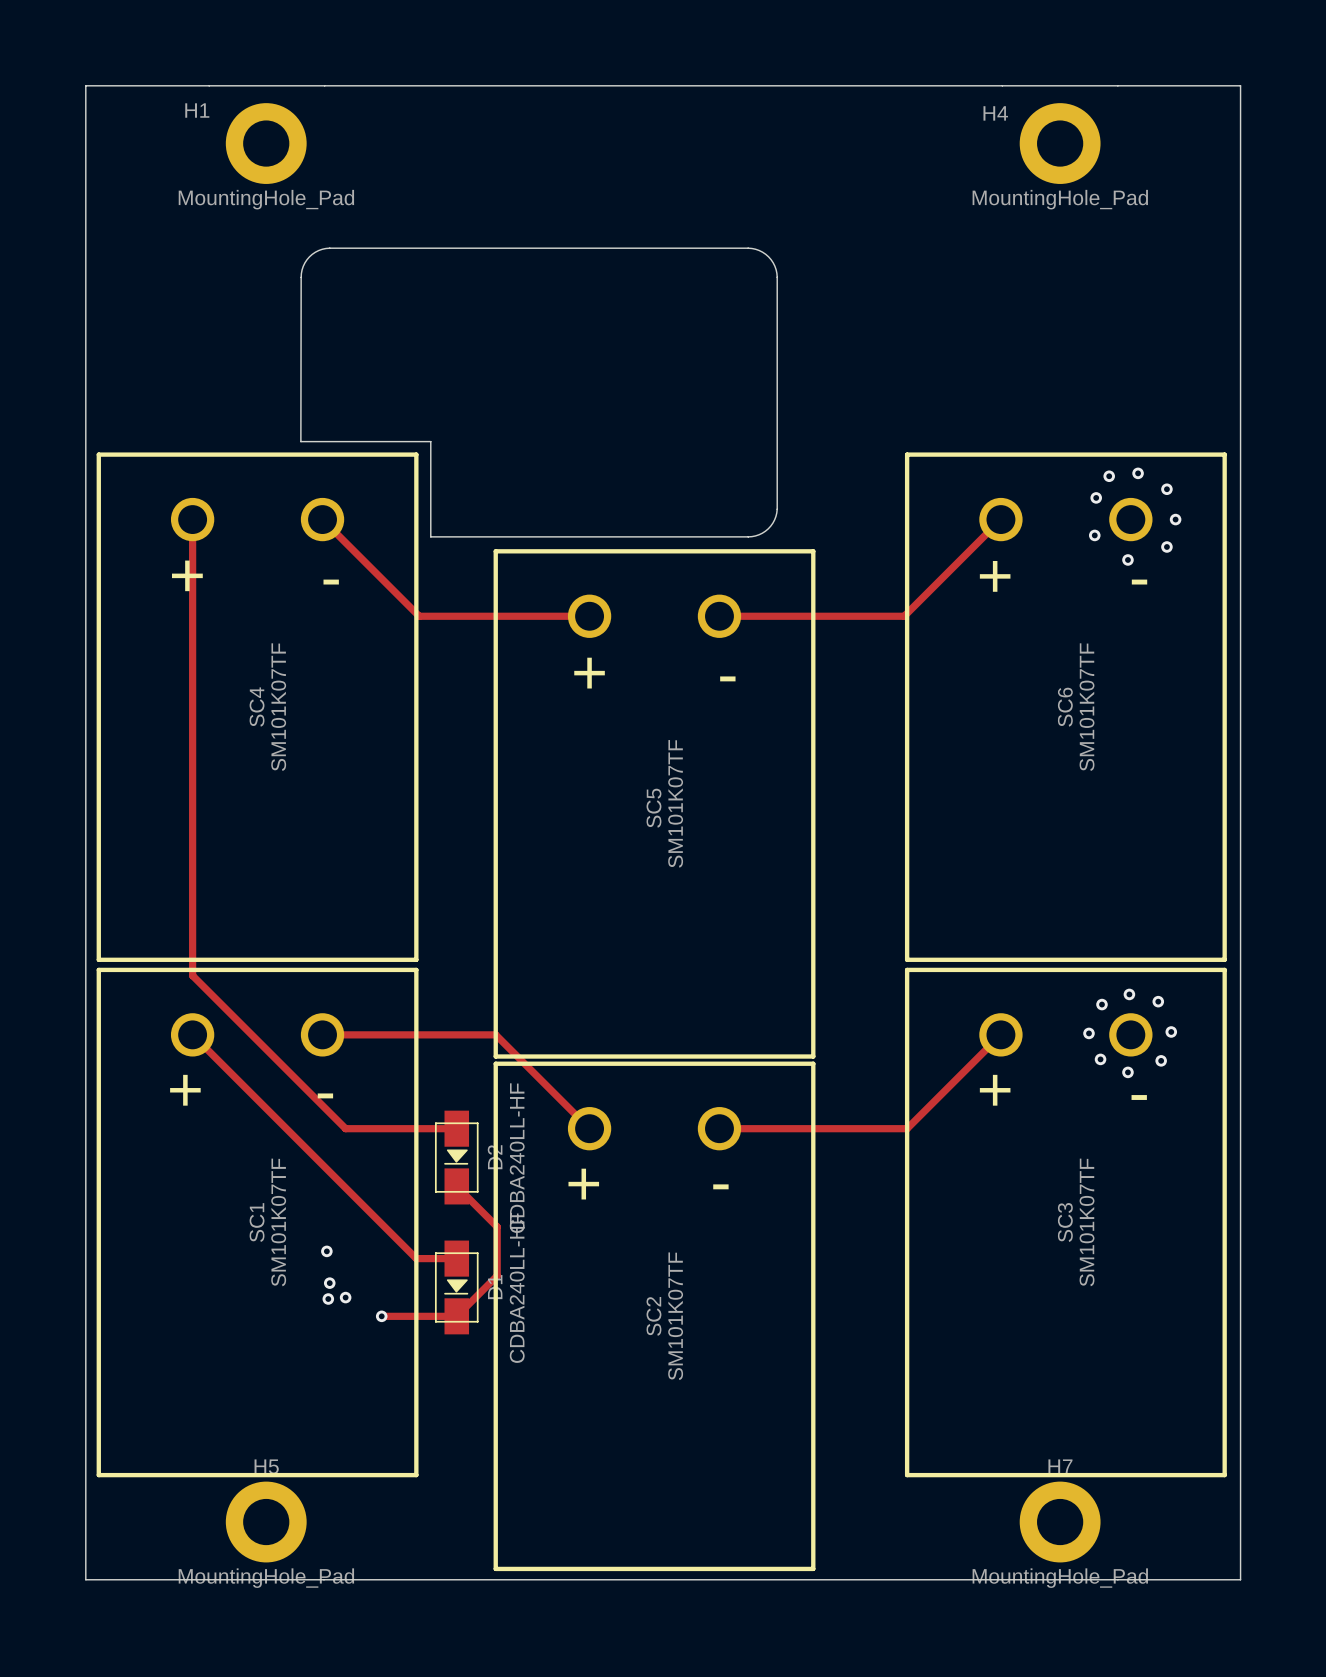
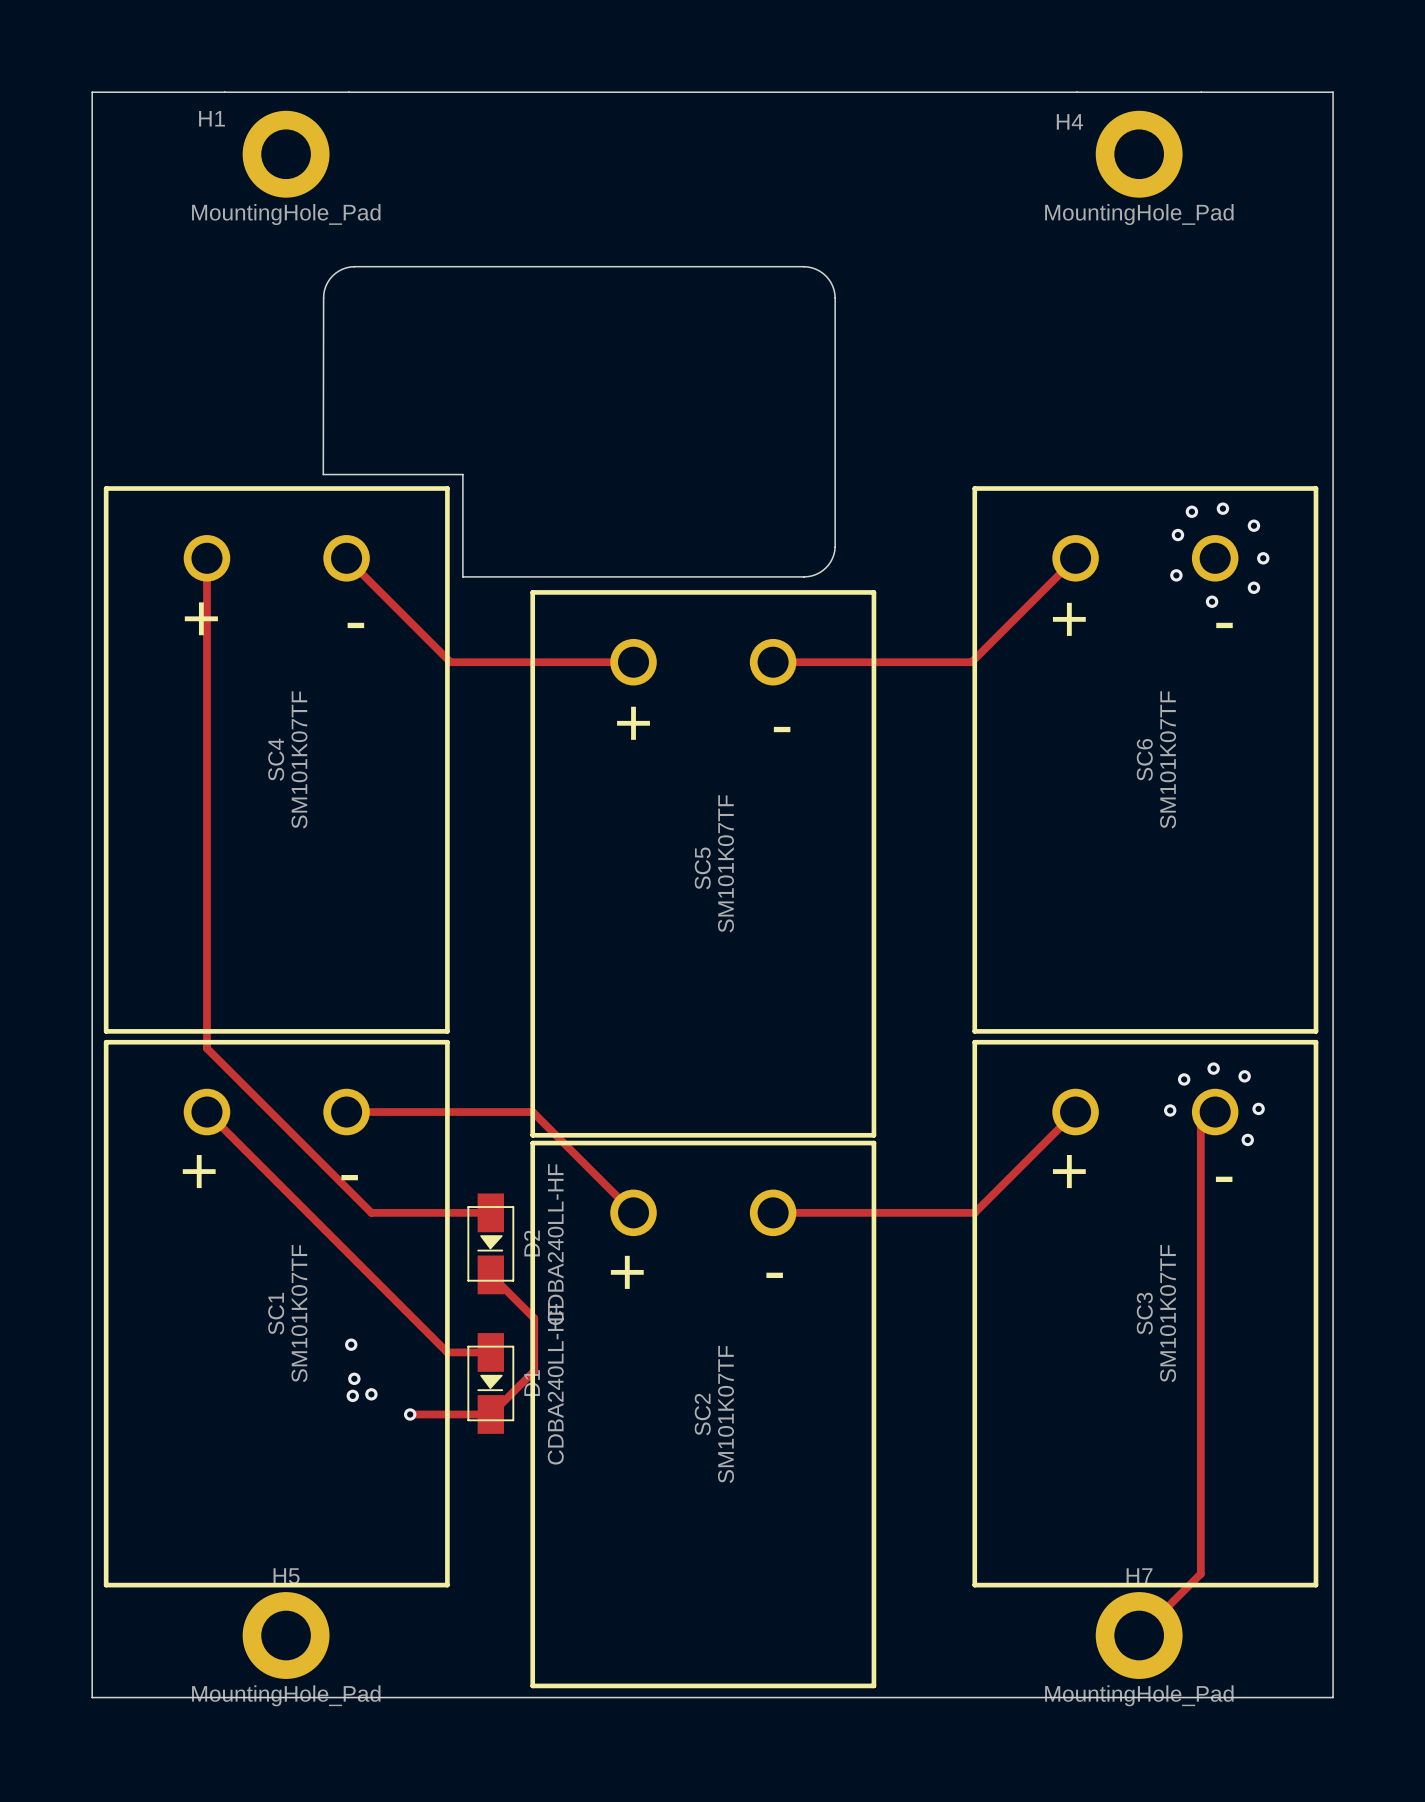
track: none -> (1215, 1112) (1200, 1126) (1200, 1573) (1139, 1635)
via: (1100, 1059) -> none
via: (1127, 1072) -> none

